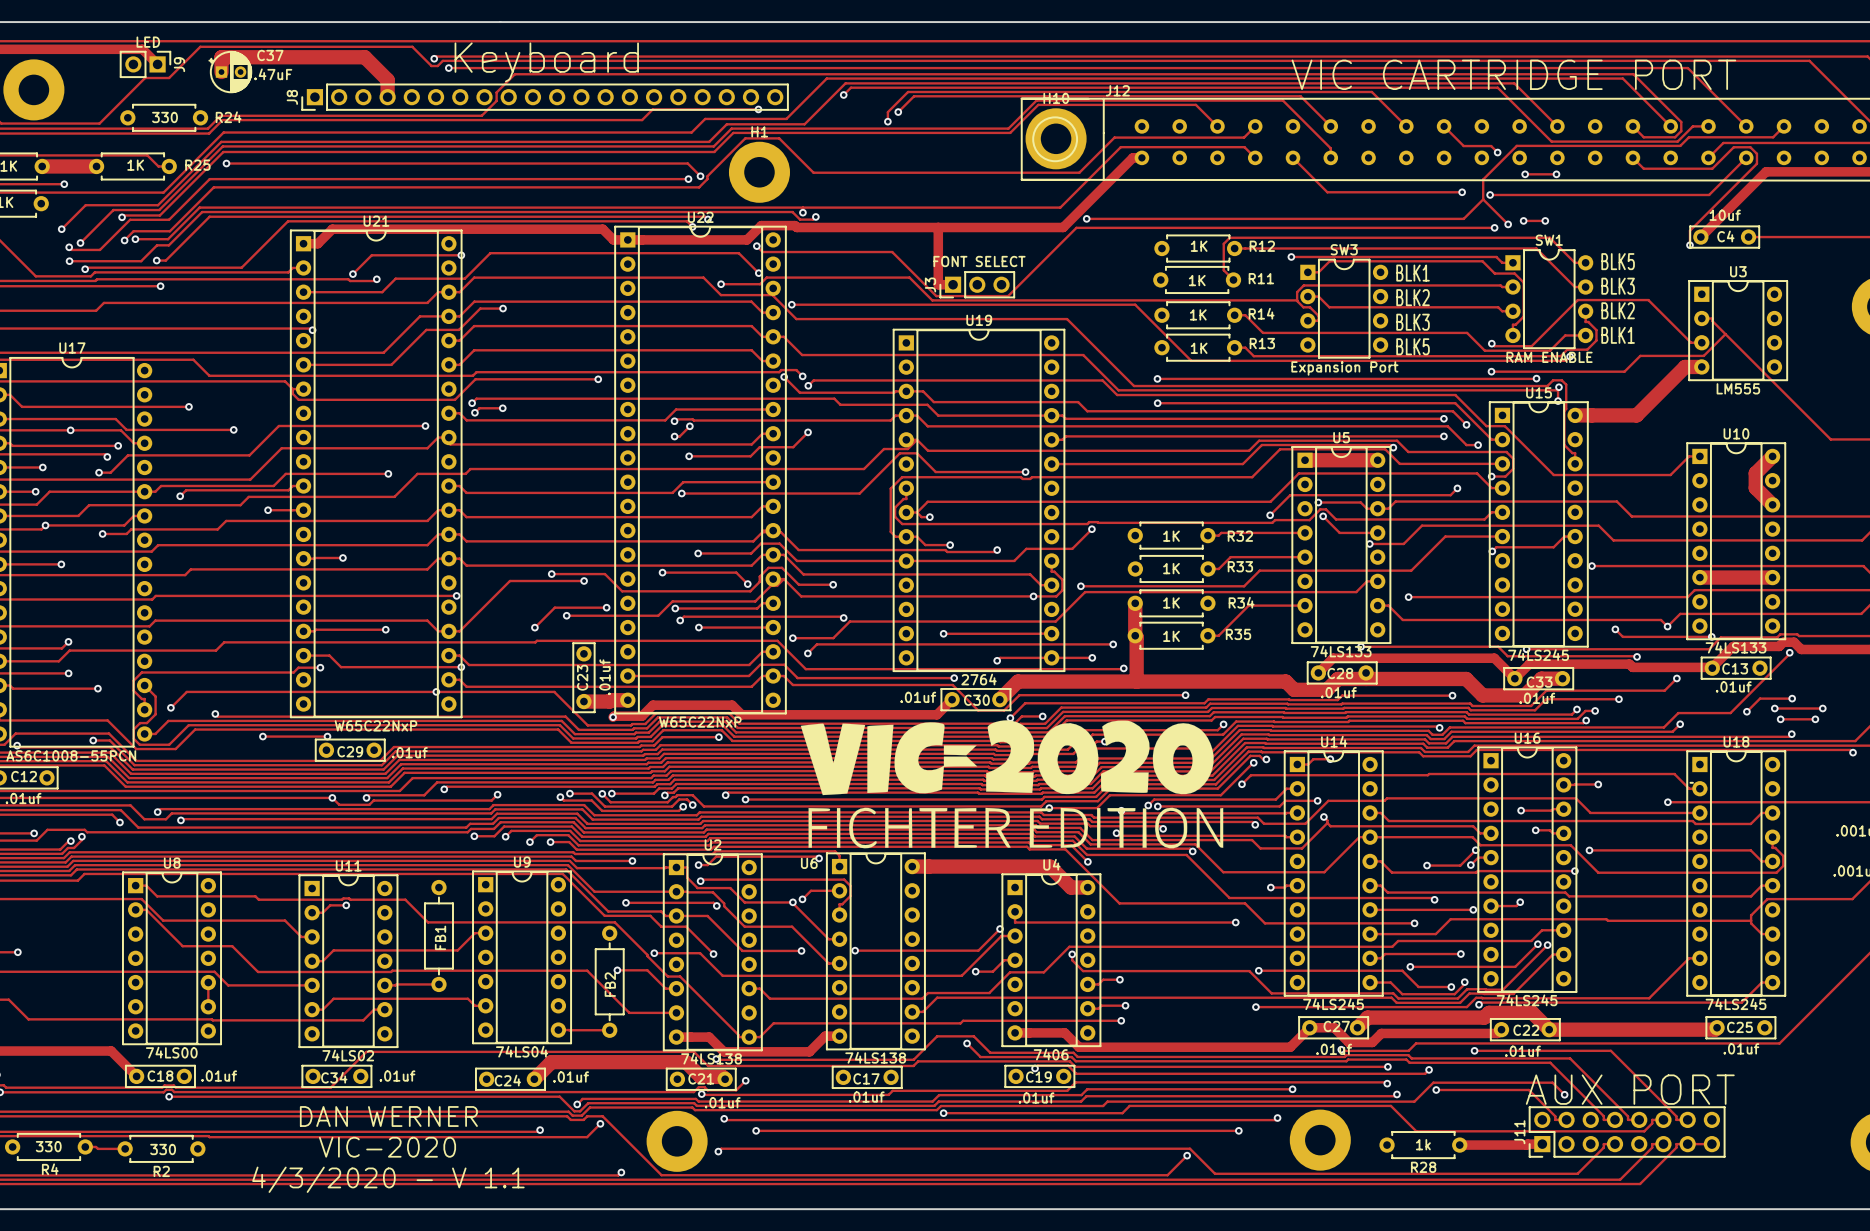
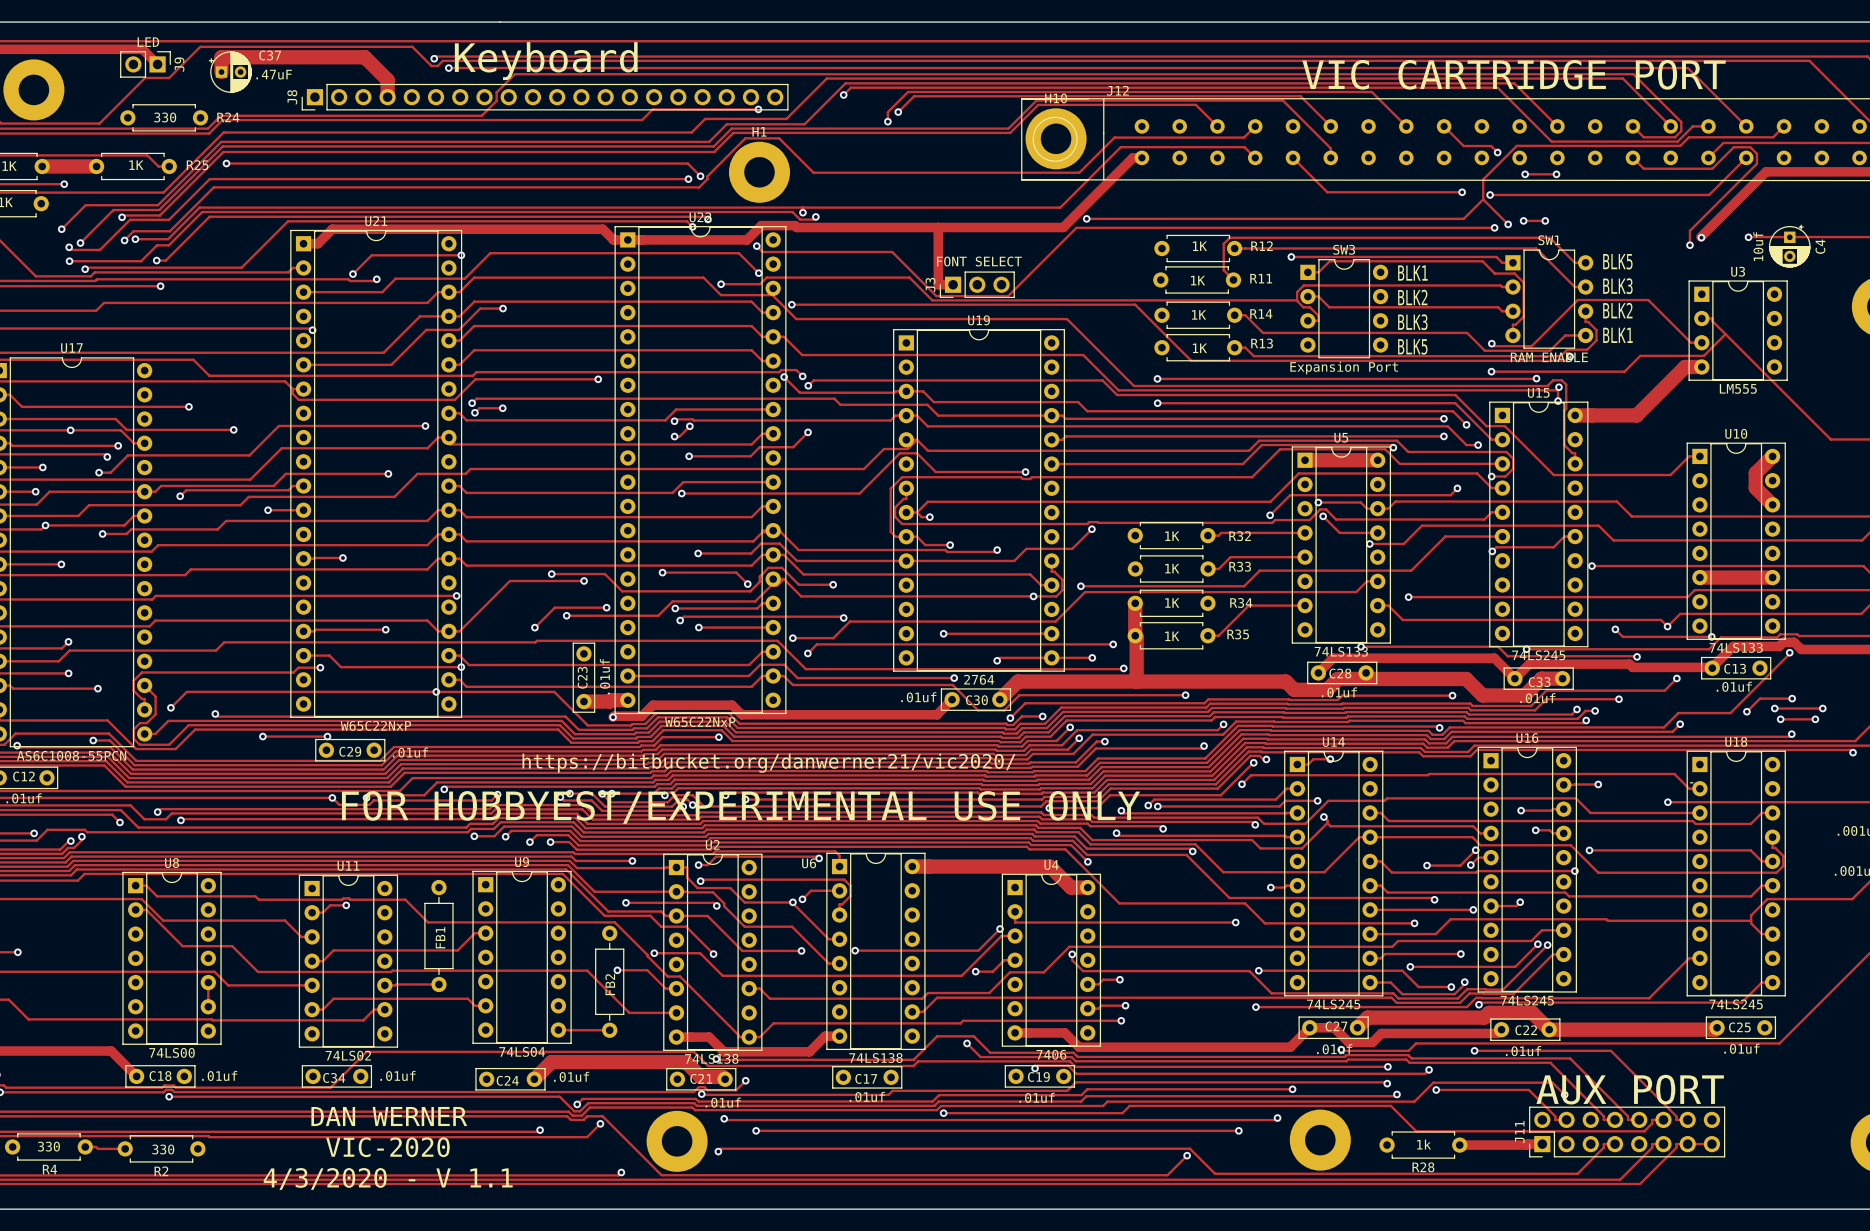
C4 value position: 10uf (1725, 215) -> 10uf (1758, 246)
C4 footprint: [1689, 225, 1760, 249] -> [1769, 224, 1811, 268]
C4 name position: C4 (1725, 236) -> C4 (1820, 246)
via: none -> (1701, 237)
via: none -> (1748, 237)
drawing: [800, 720, 1224, 849] -> none
text: none -> https://bitbucket.org/danwerner21/vic2020/ (768, 763)
text: none -> FOR HOBBYEST/EXPERIMENTAL USE ONLY (741, 807)

